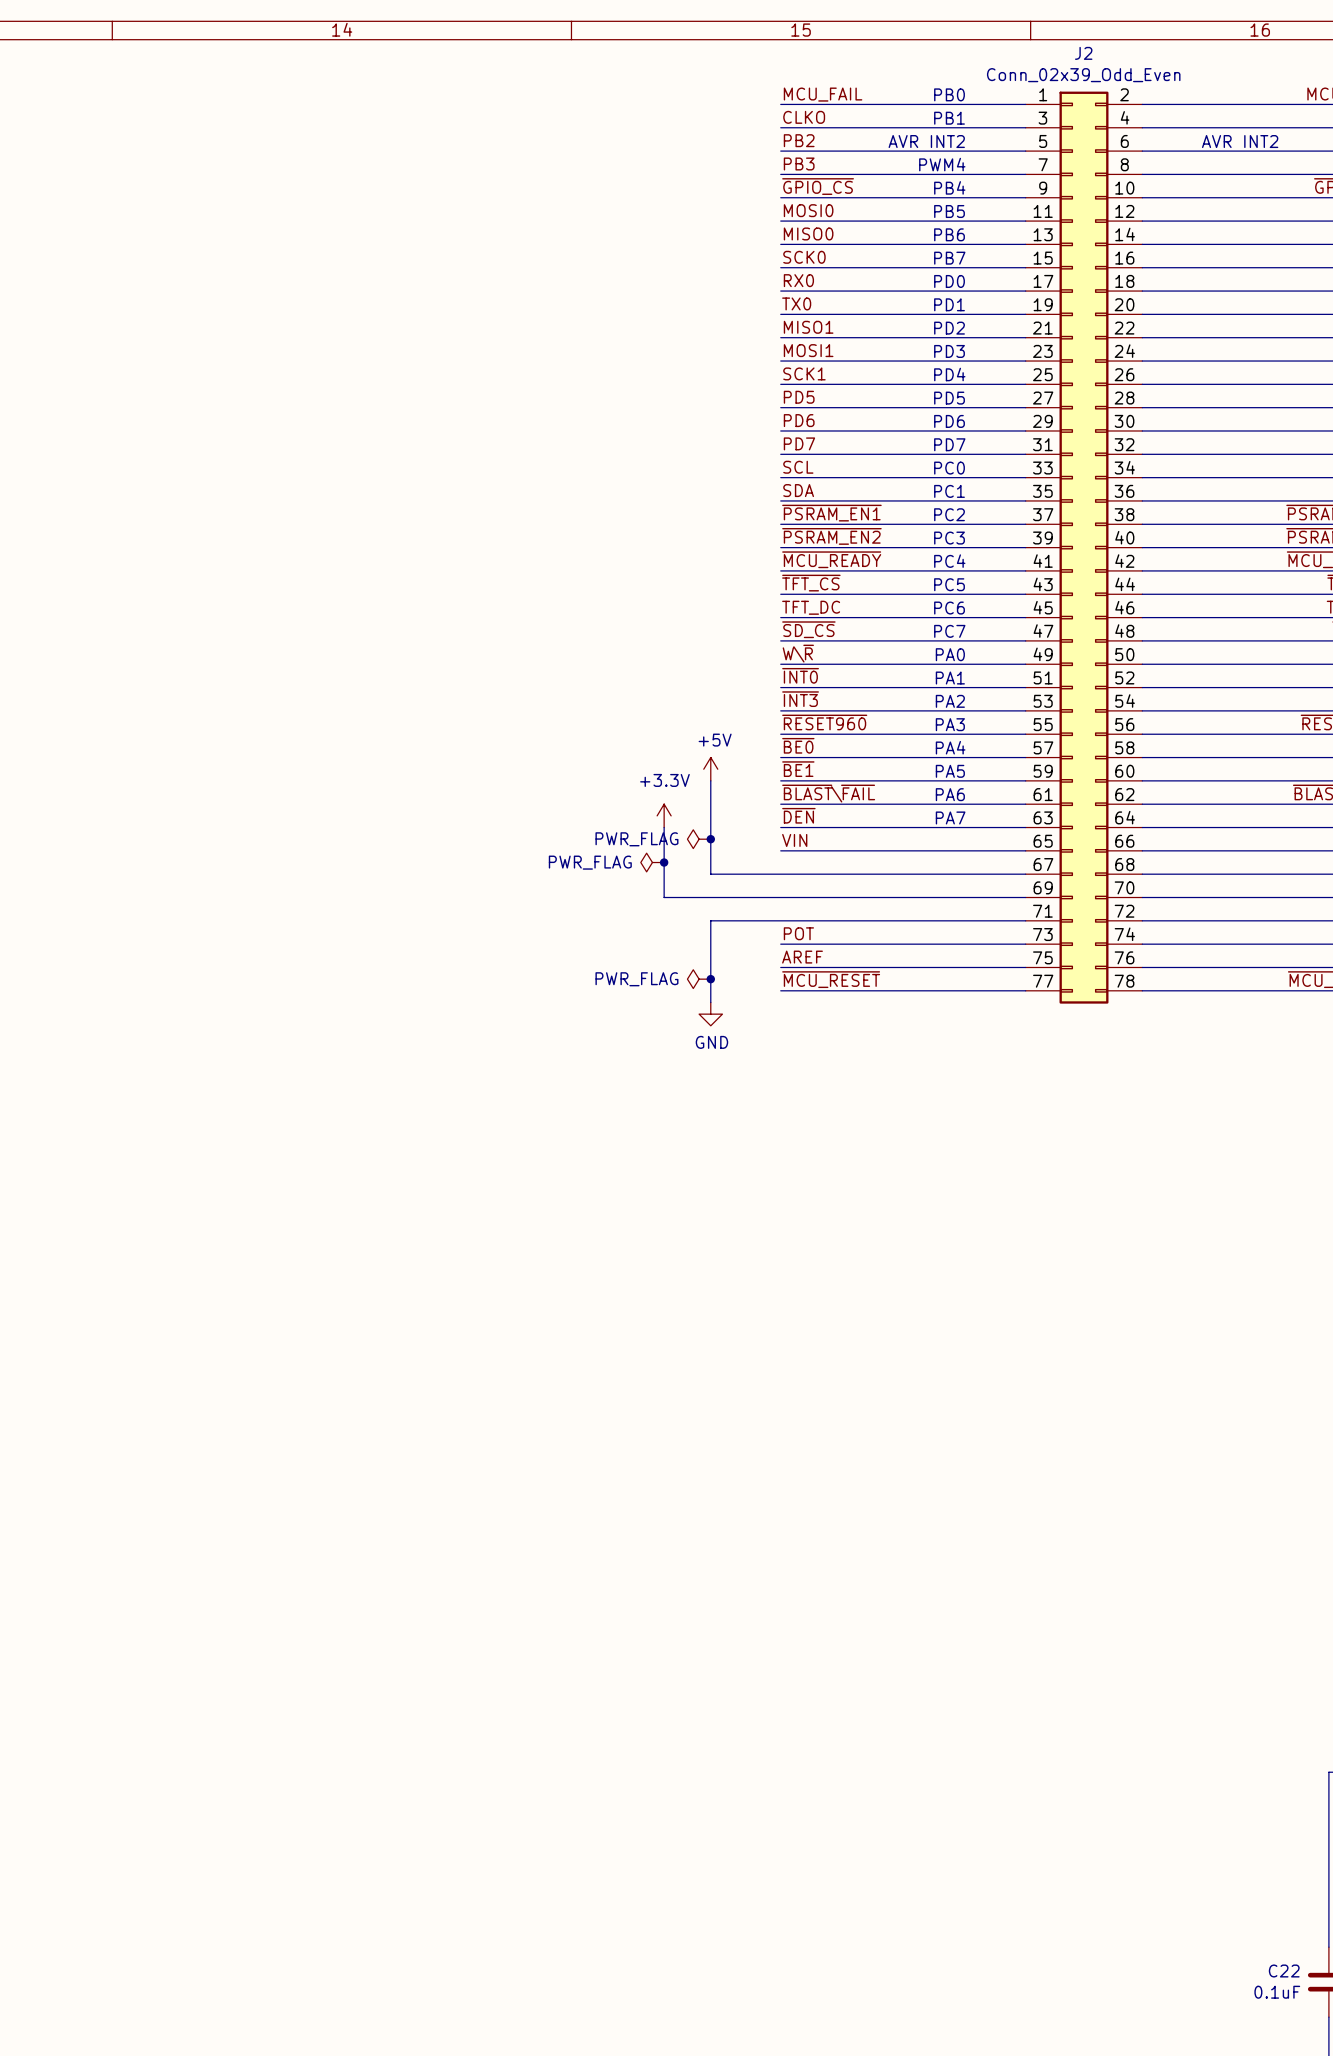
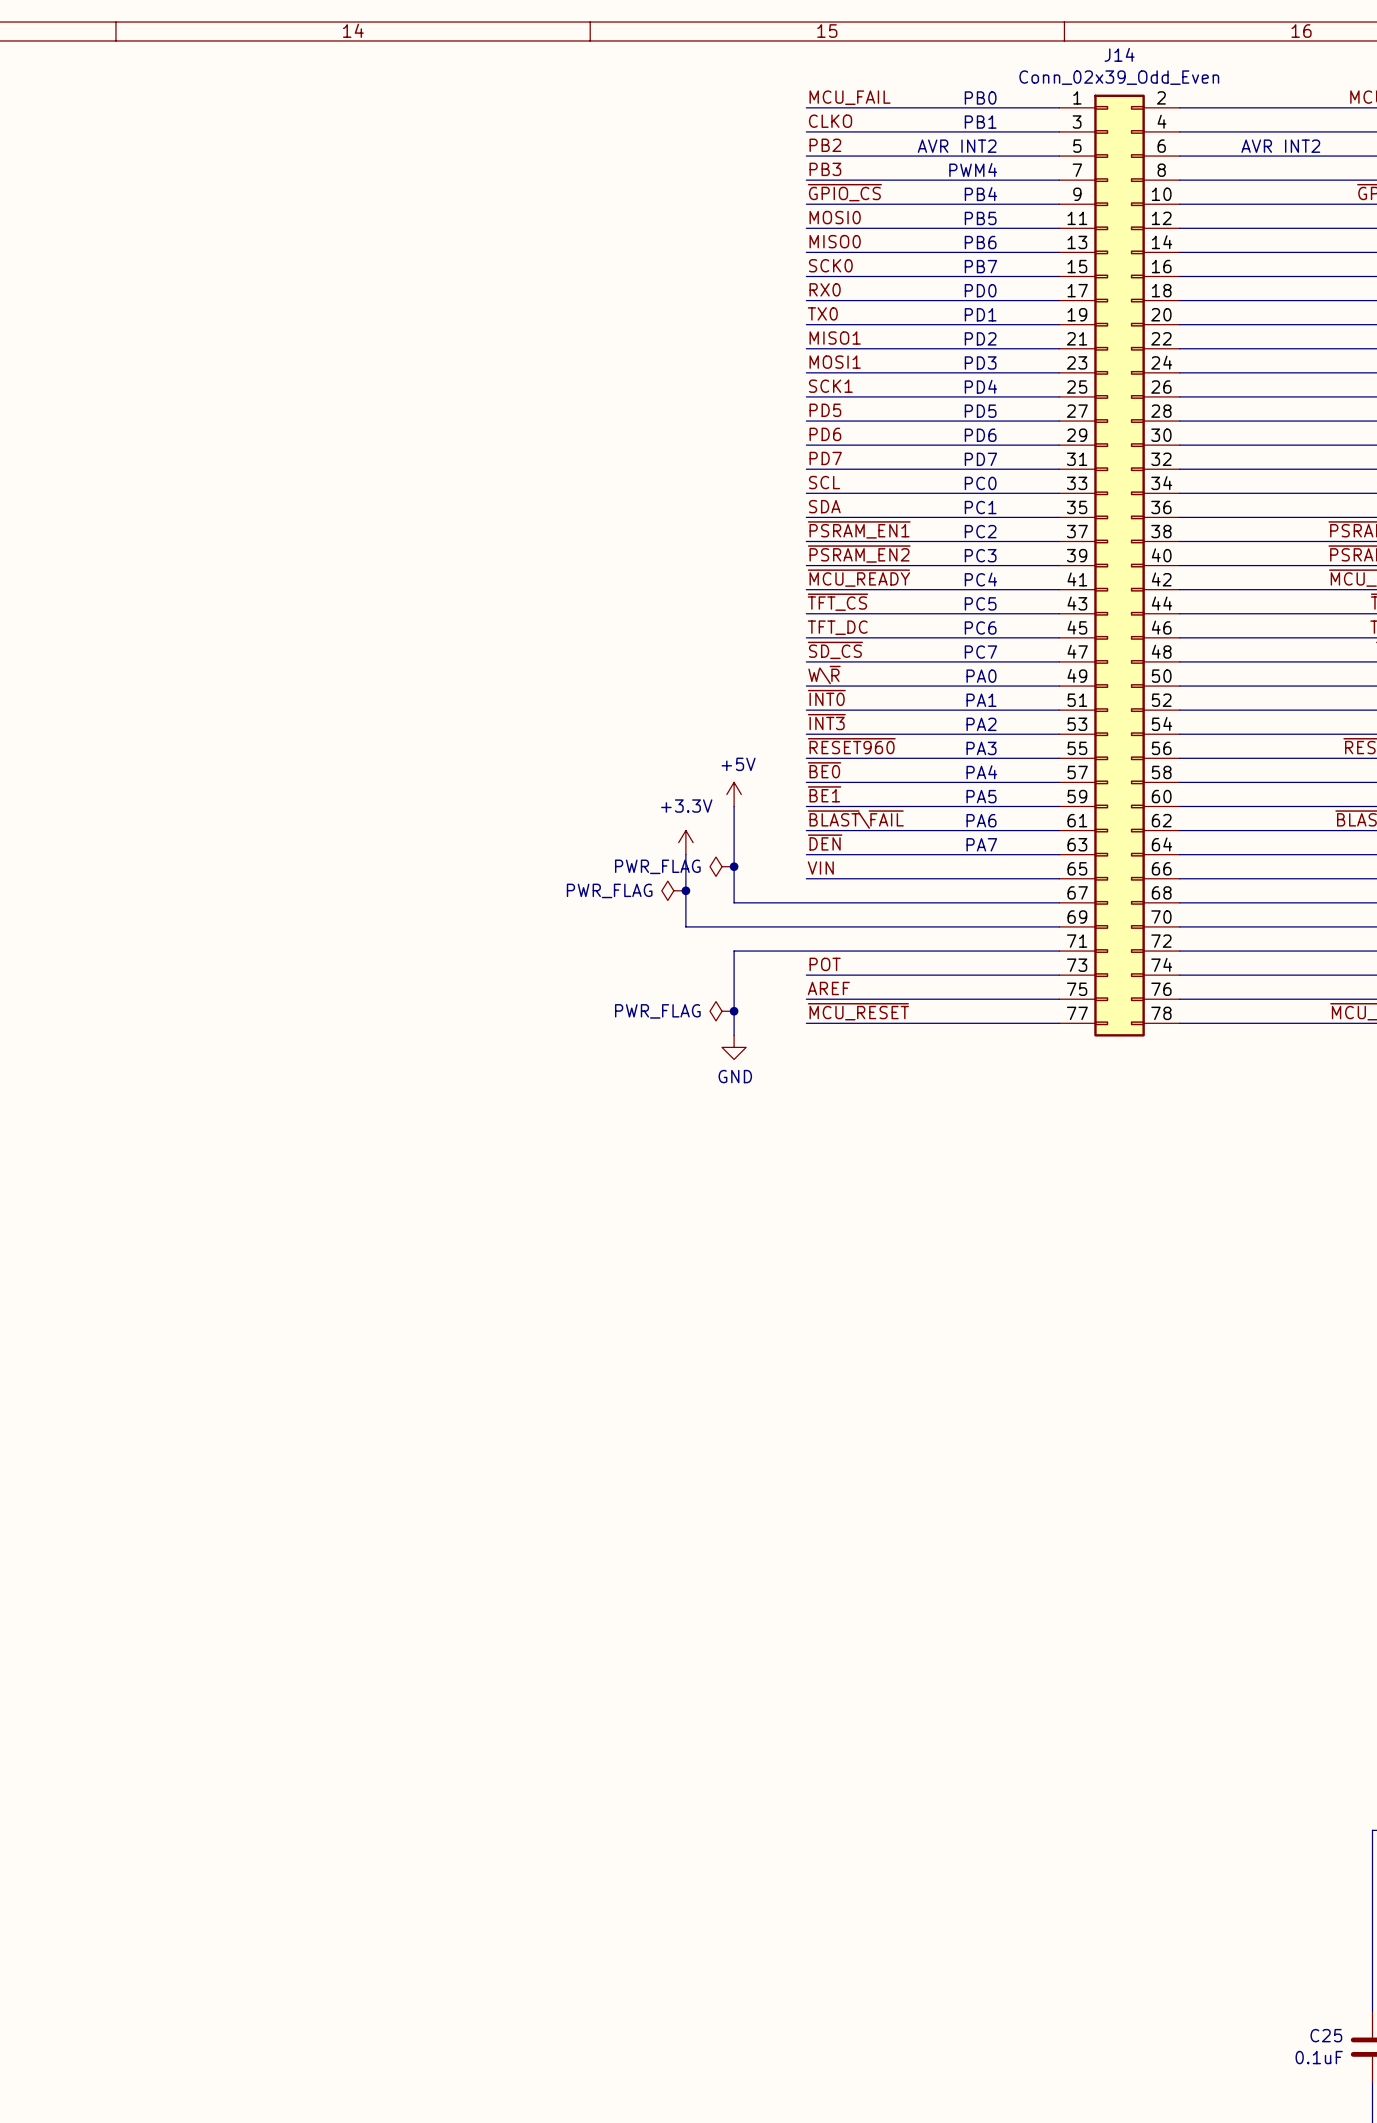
J2 name: J2 (1083, 53) -> J14 (1119, 54)
C22 name: C22 (1284, 1970) -> C25 (1326, 2035)

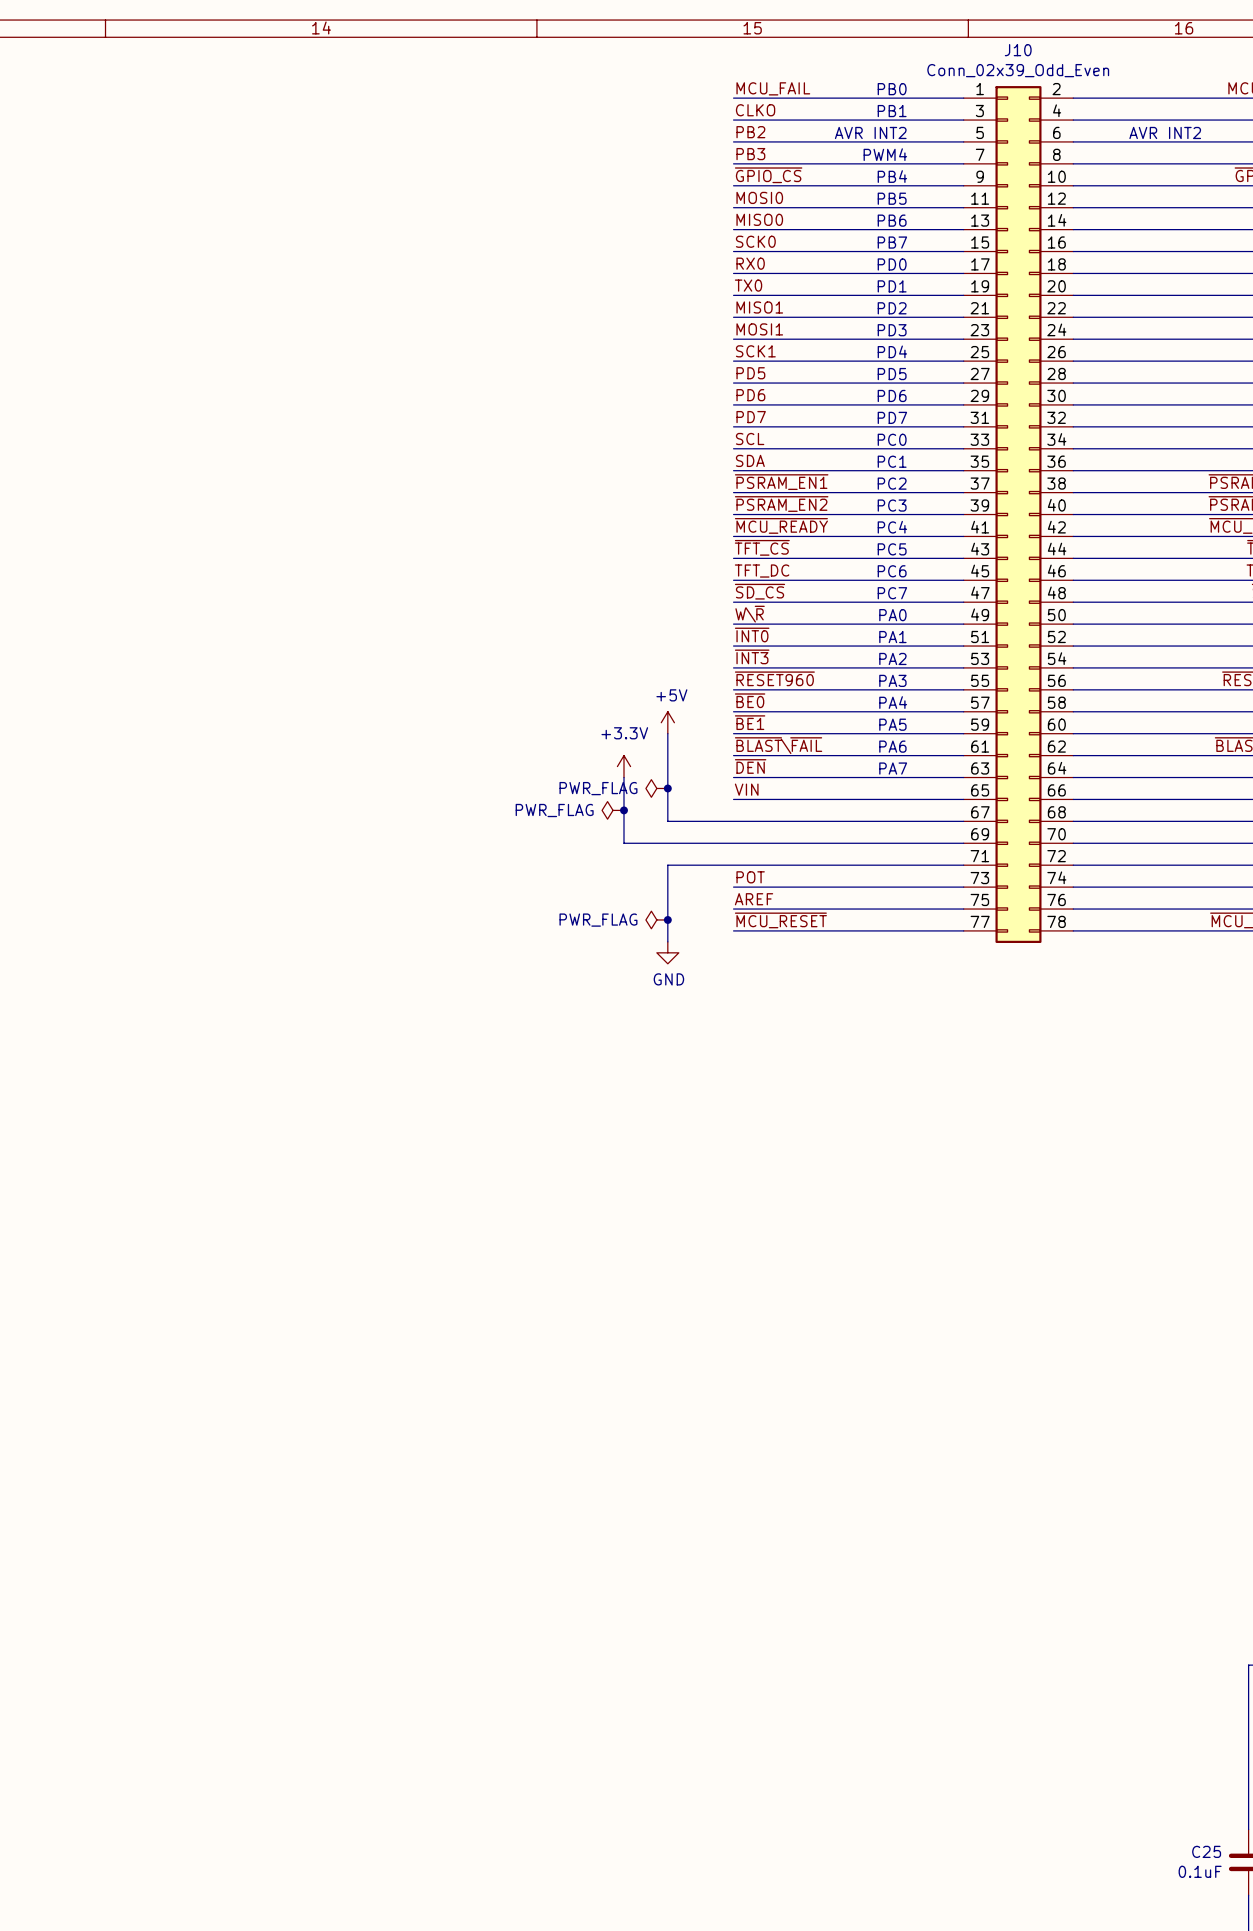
J14 name: J14 (1119, 54) -> J10 (1018, 50)

